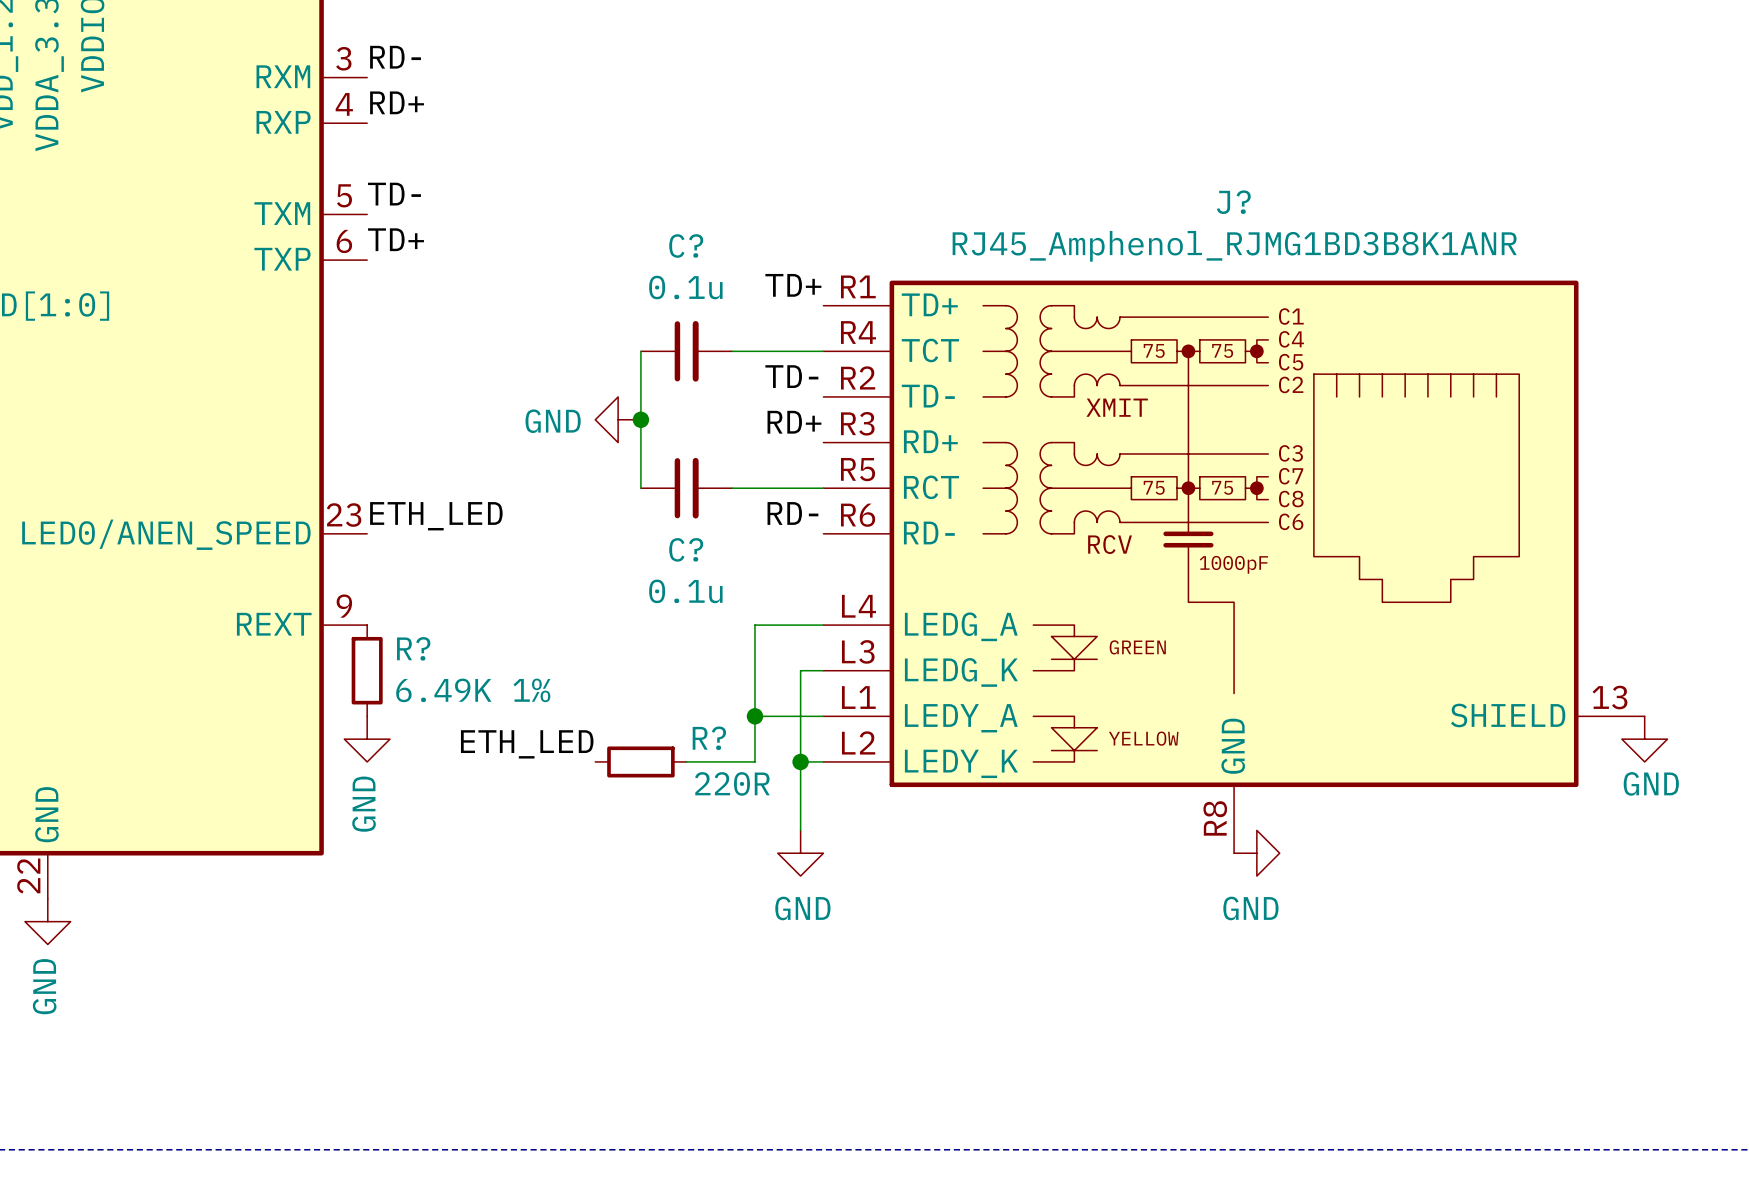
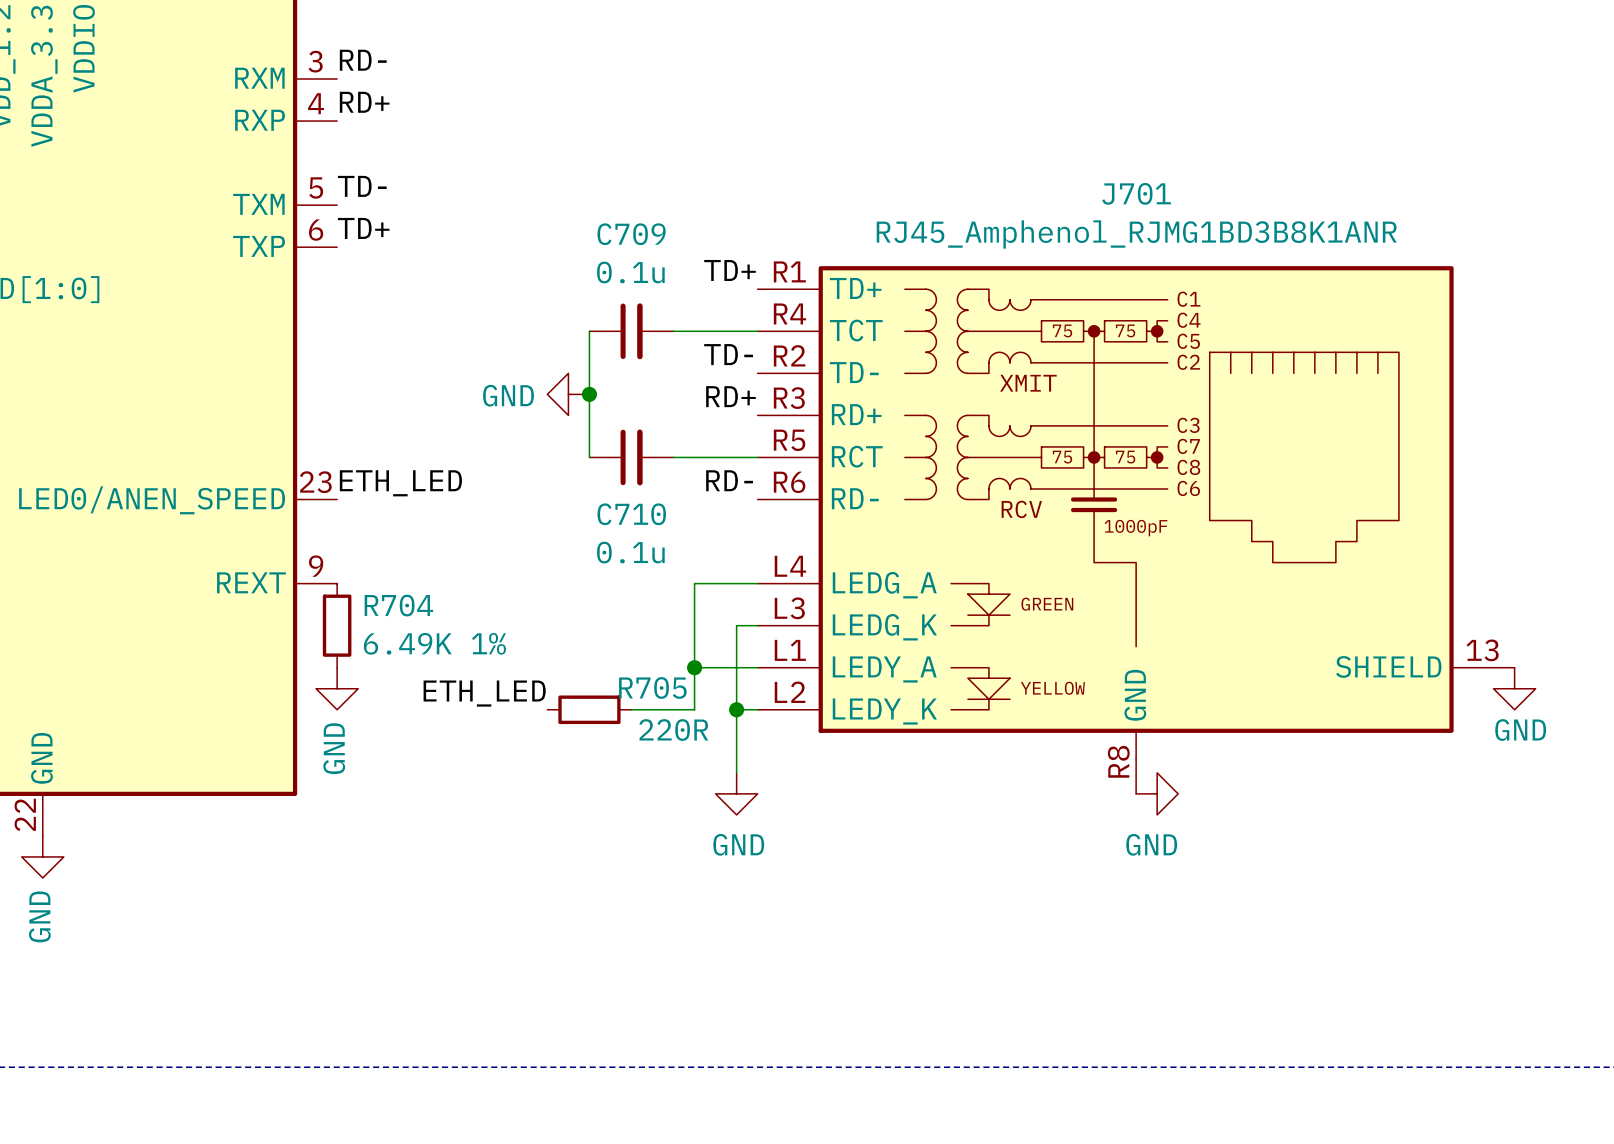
J? name: J? (1233, 202) -> J701 (1136, 193)
C? name: C? (686, 246) -> C709 (631, 234)
C? name: C? (686, 549) -> C710 (631, 514)
R? name: R? (413, 648) -> R704 (398, 605)
R? name: R? (709, 738) -> R705 (652, 687)

